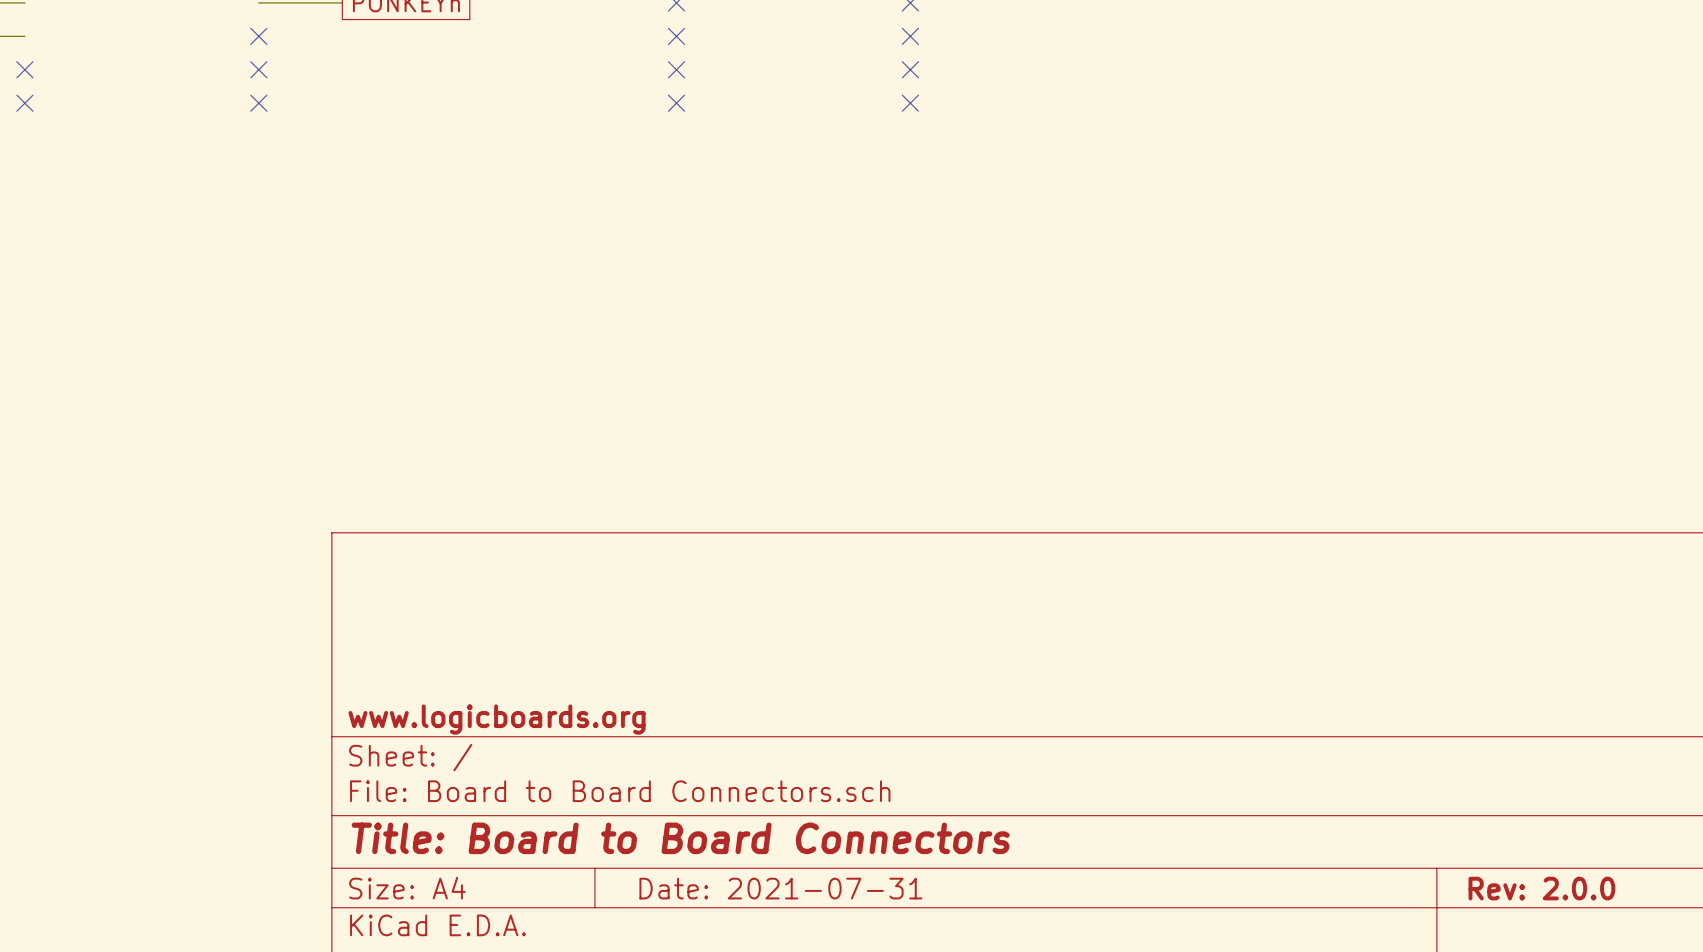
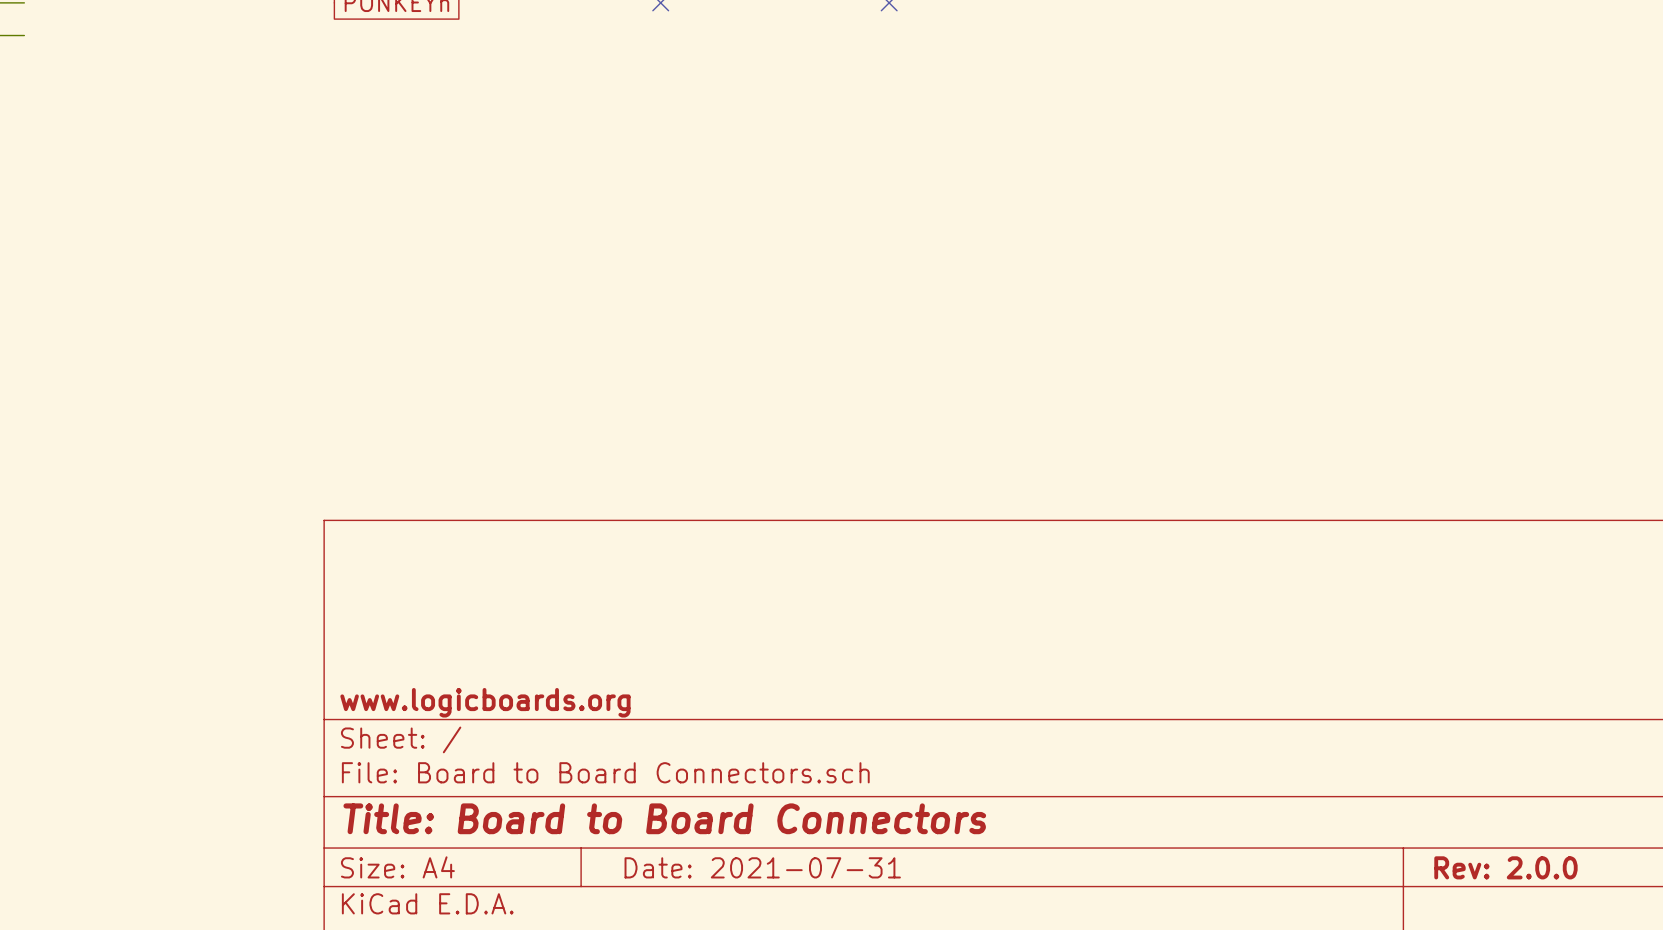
wire: (258, 2) (342, 2) -> none
no-connect mark: (258, 36) -> none
no-connect mark: (676, 36) -> none
no-connect mark: (910, 36) -> none
no-connect mark: (24, 69) -> none
no-connect mark: (258, 69) -> none
no-connect mark: (676, 69) -> none
no-connect mark: (910, 69) -> none
no-connect mark: (24, 103) -> none
no-connect mark: (258, 103) -> none
no-connect mark: (676, 103) -> none
no-connect mark: (910, 103) -> none

